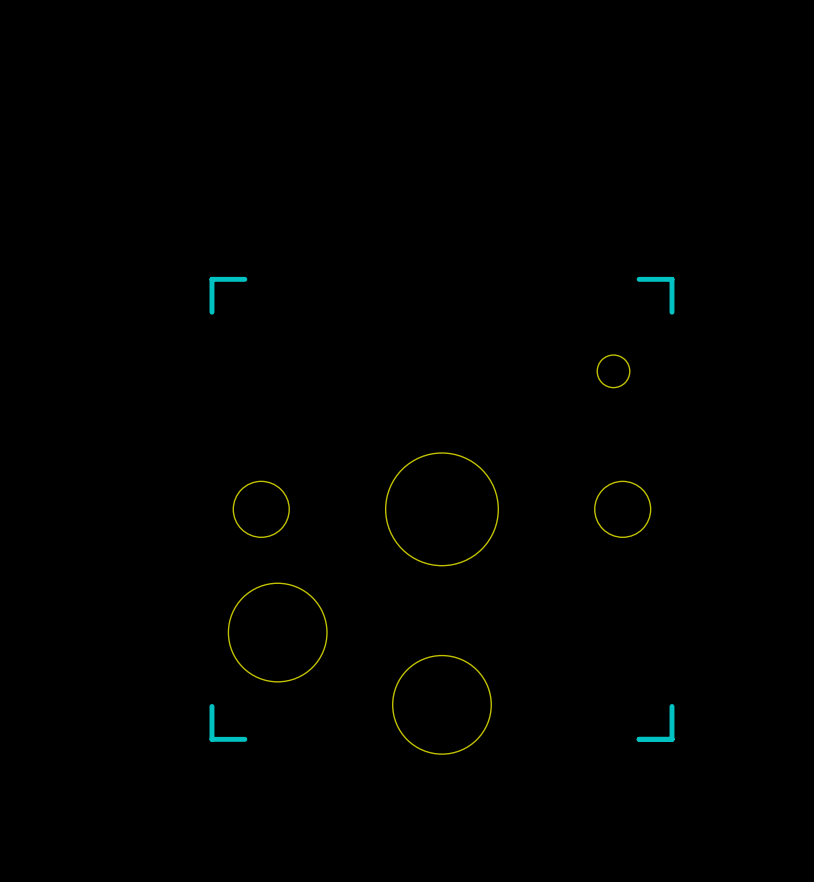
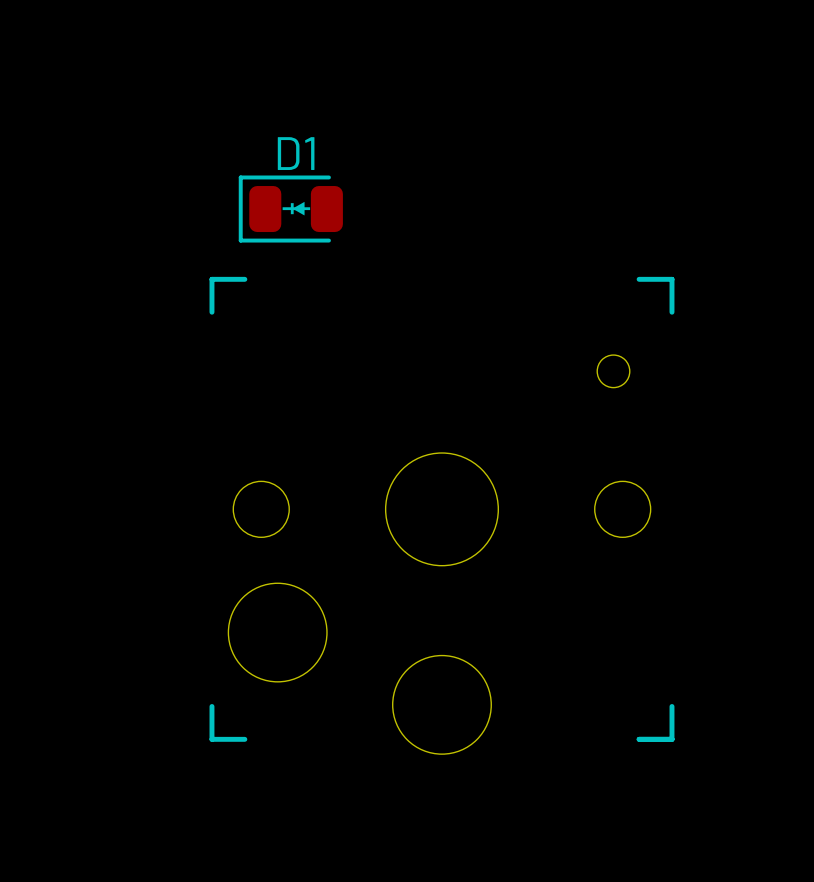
D1: none -> (290, 209)

